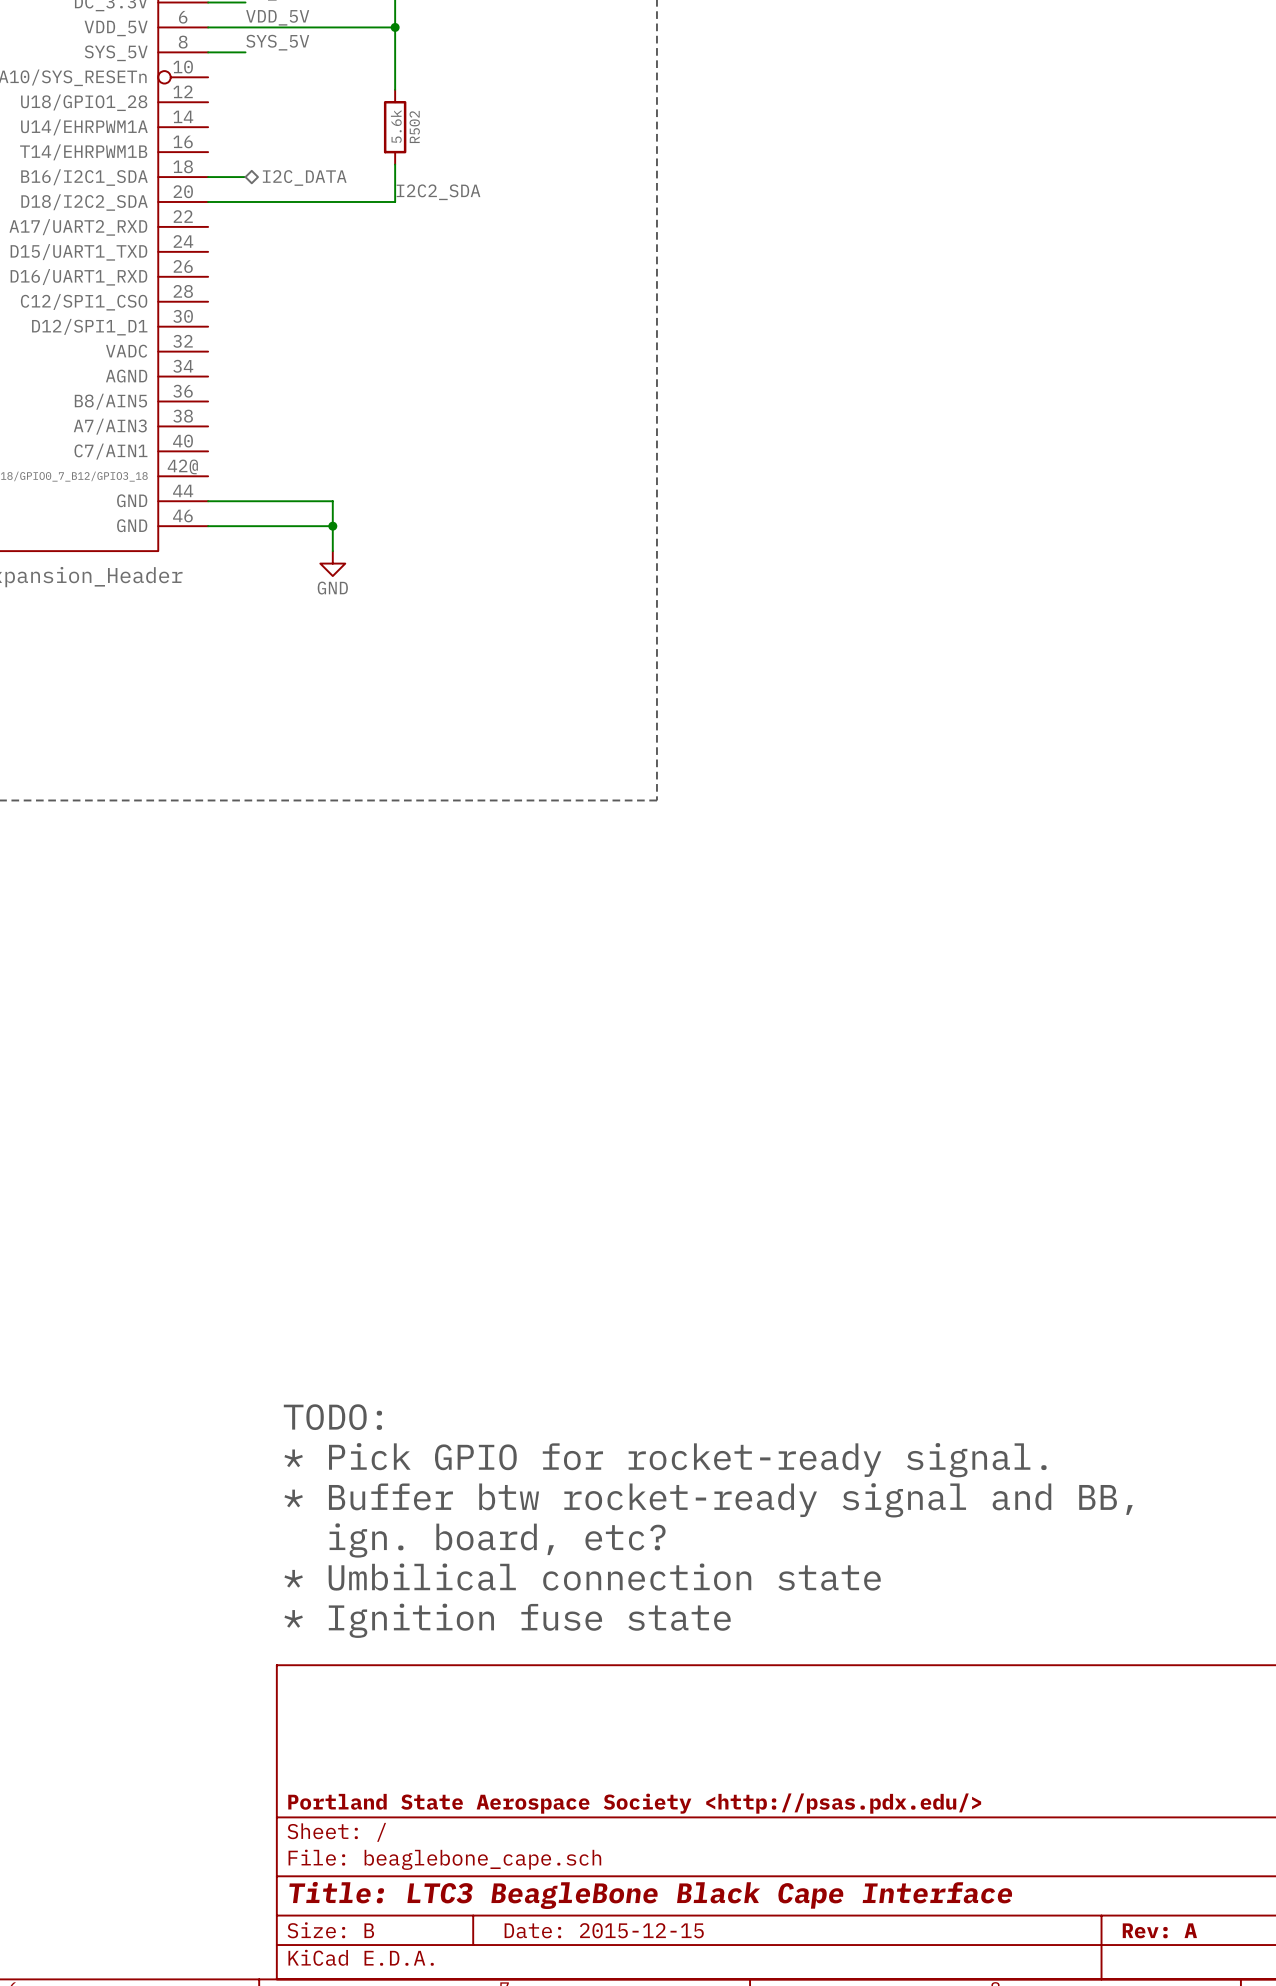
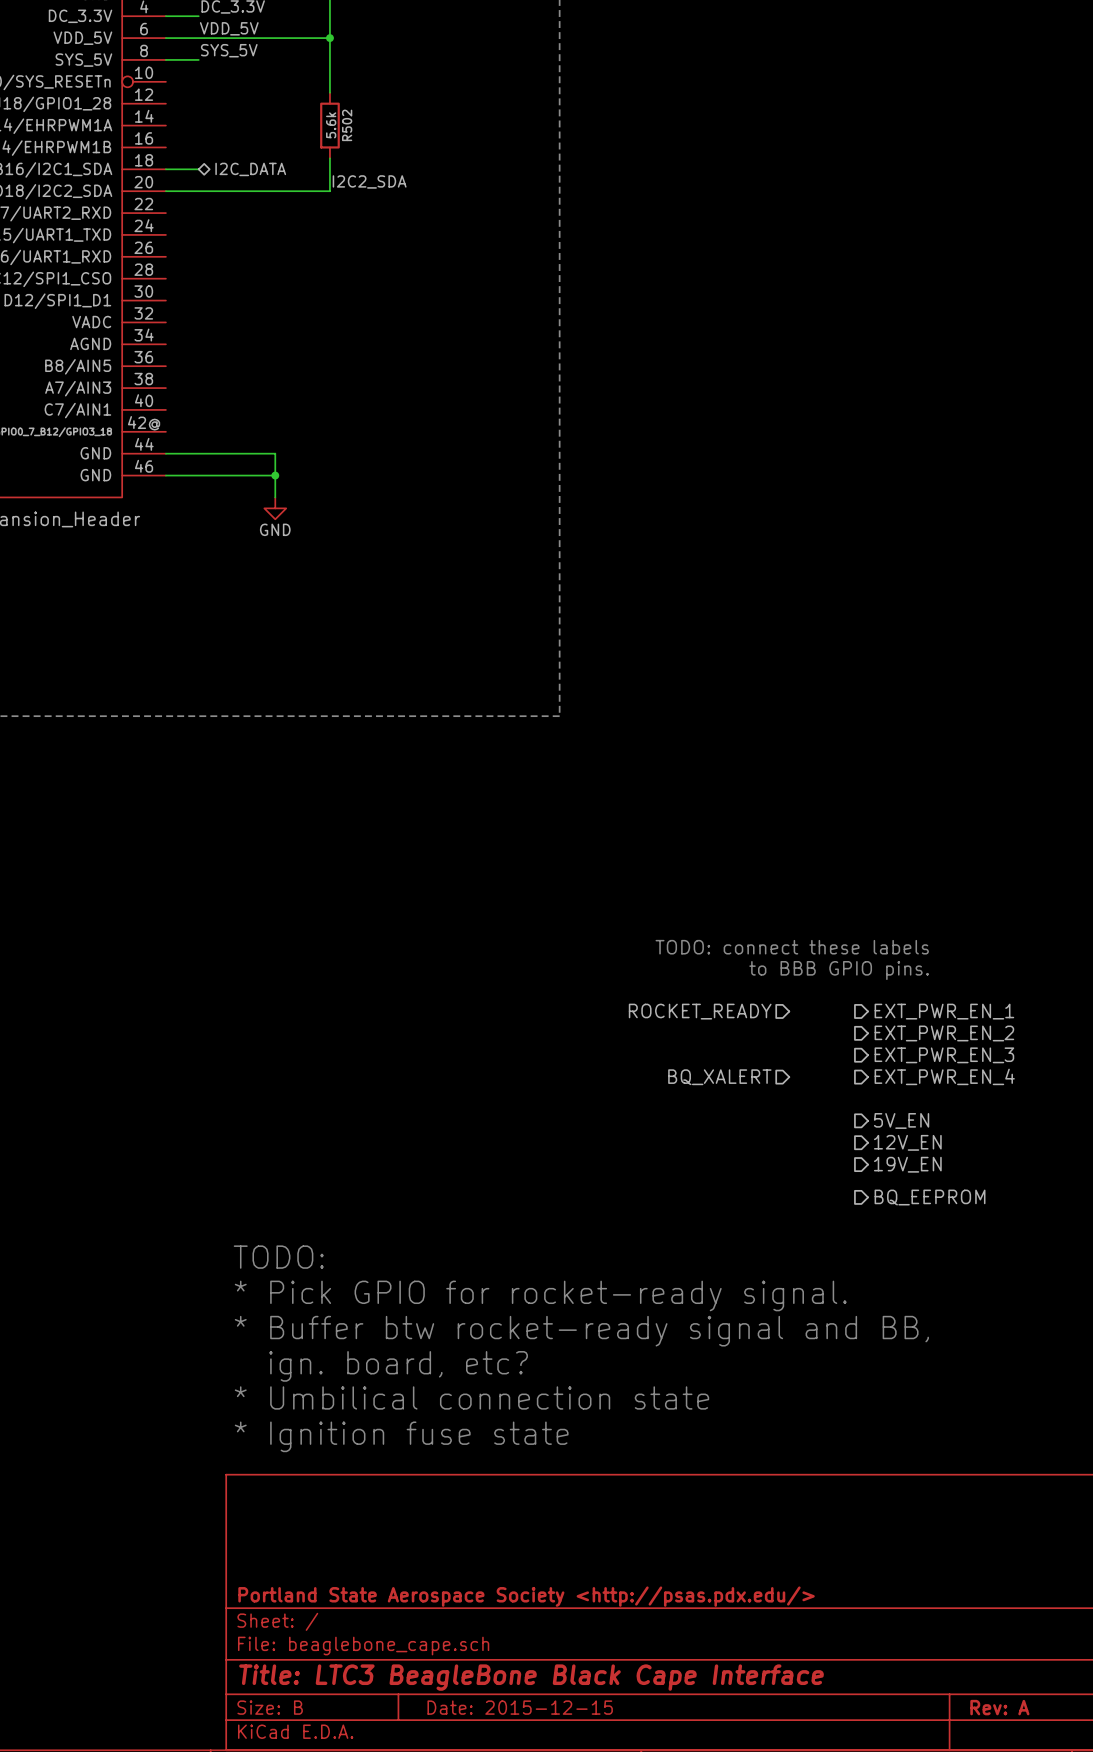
text: none -> TODO: connect these labels (792, 947)
text: none -> to BBB GPIO pins. (839, 970)
hierarchical label: none -> ROCKET_READY (700, 1011)
hierarchical label: none -> EXT_PWR_EN_1 (944, 1011)
hierarchical label: none -> EXT_PWR_EN_2 (944, 1033)
hierarchical label: none -> EXT_PWR_EN_3 (944, 1055)
hierarchical label: none -> BQ_XALERT (719, 1077)
hierarchical label: none -> EXT_PWR_EN_4 (944, 1076)
hierarchical label: none -> 5V_EN (901, 1120)
hierarchical label: none -> 12V_EN (907, 1142)
hierarchical label: none -> 19V_EN (907, 1164)
hierarchical label: none -> BQ_EEPROM (930, 1197)

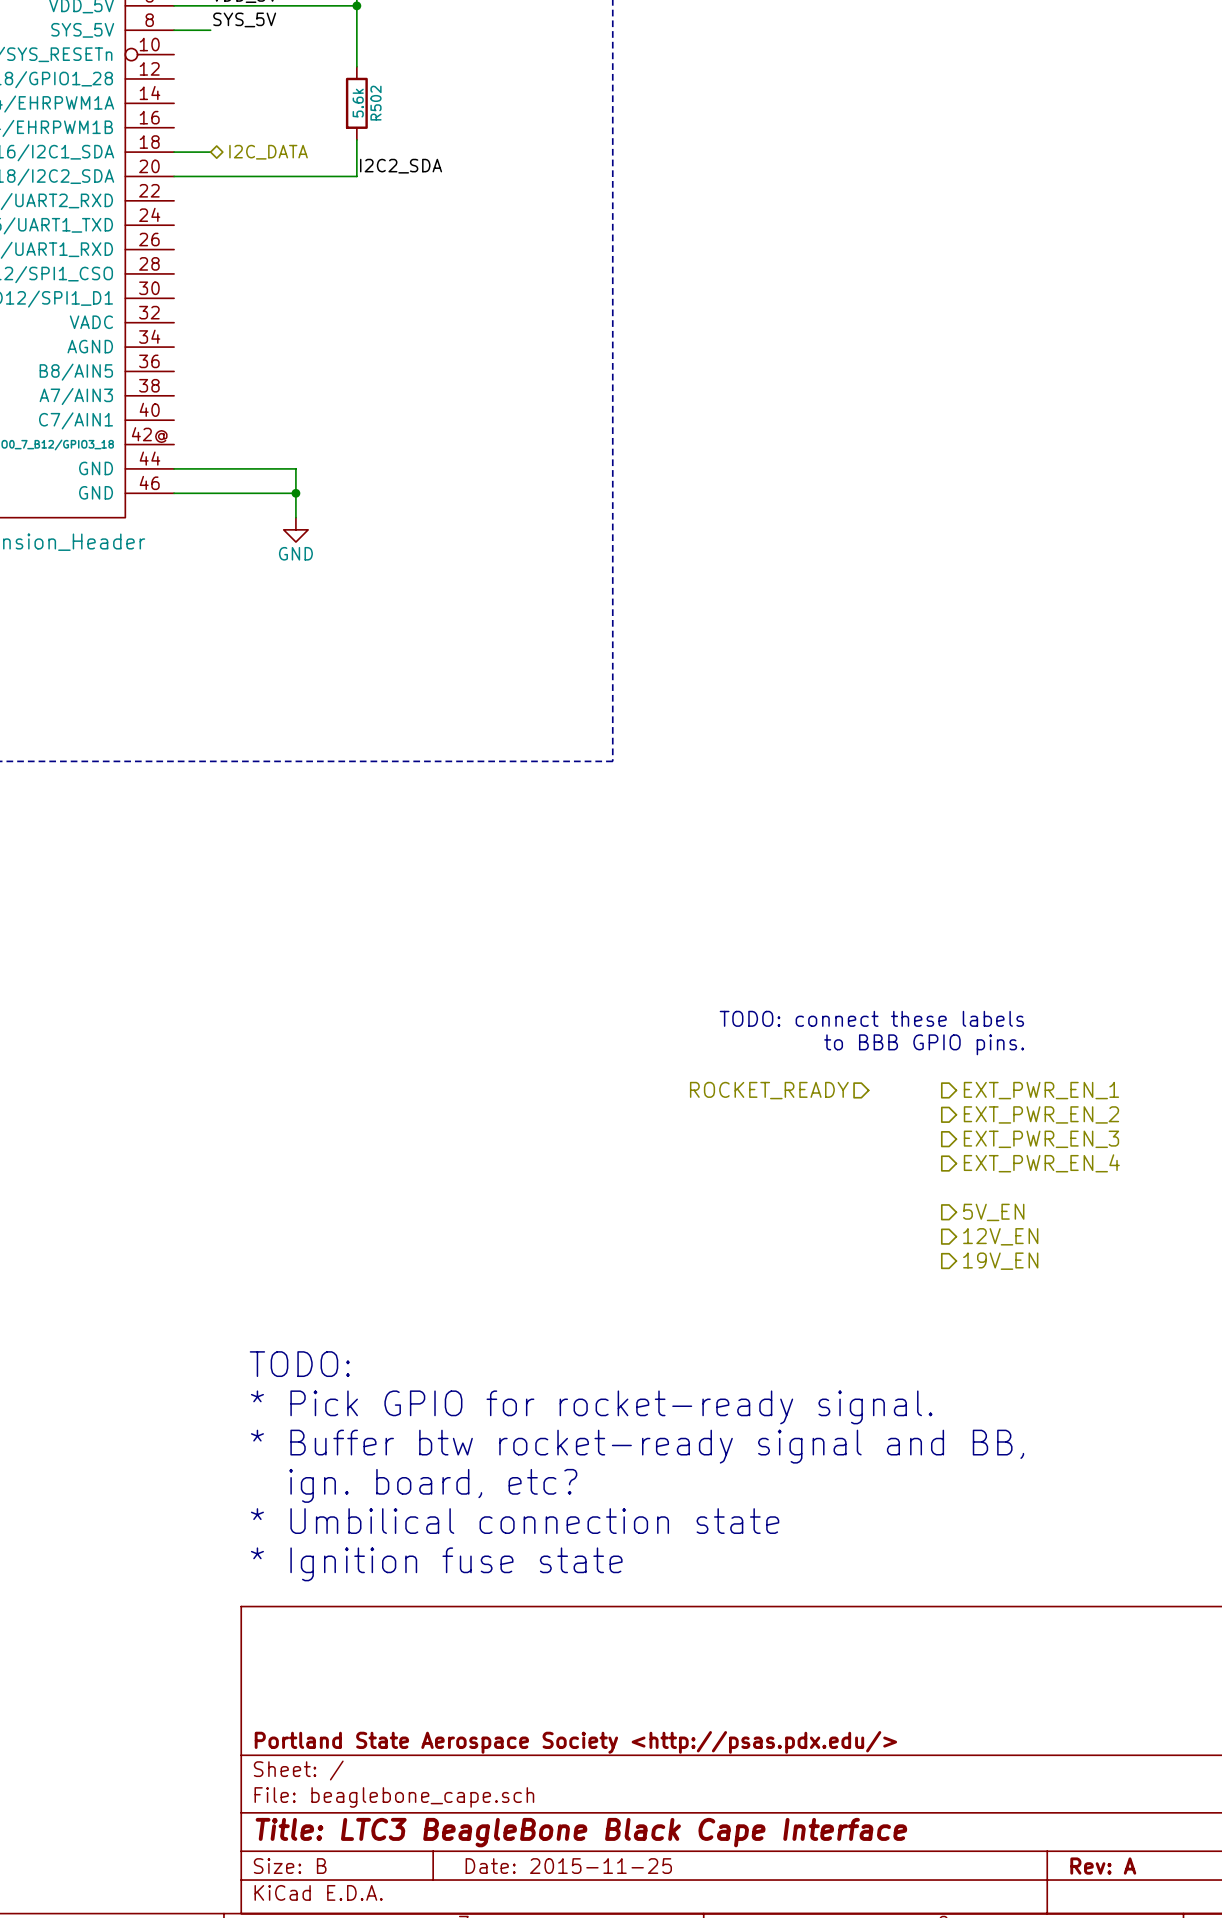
hierarchical label: BQ_XALERT (719, 1077) -> none
hierarchical label: BQ_EEPROM (930, 1197) -> none
title block: Date: 2015-12-15 (520, 1707) -> Date: 2015-11-25 (568, 1866)

